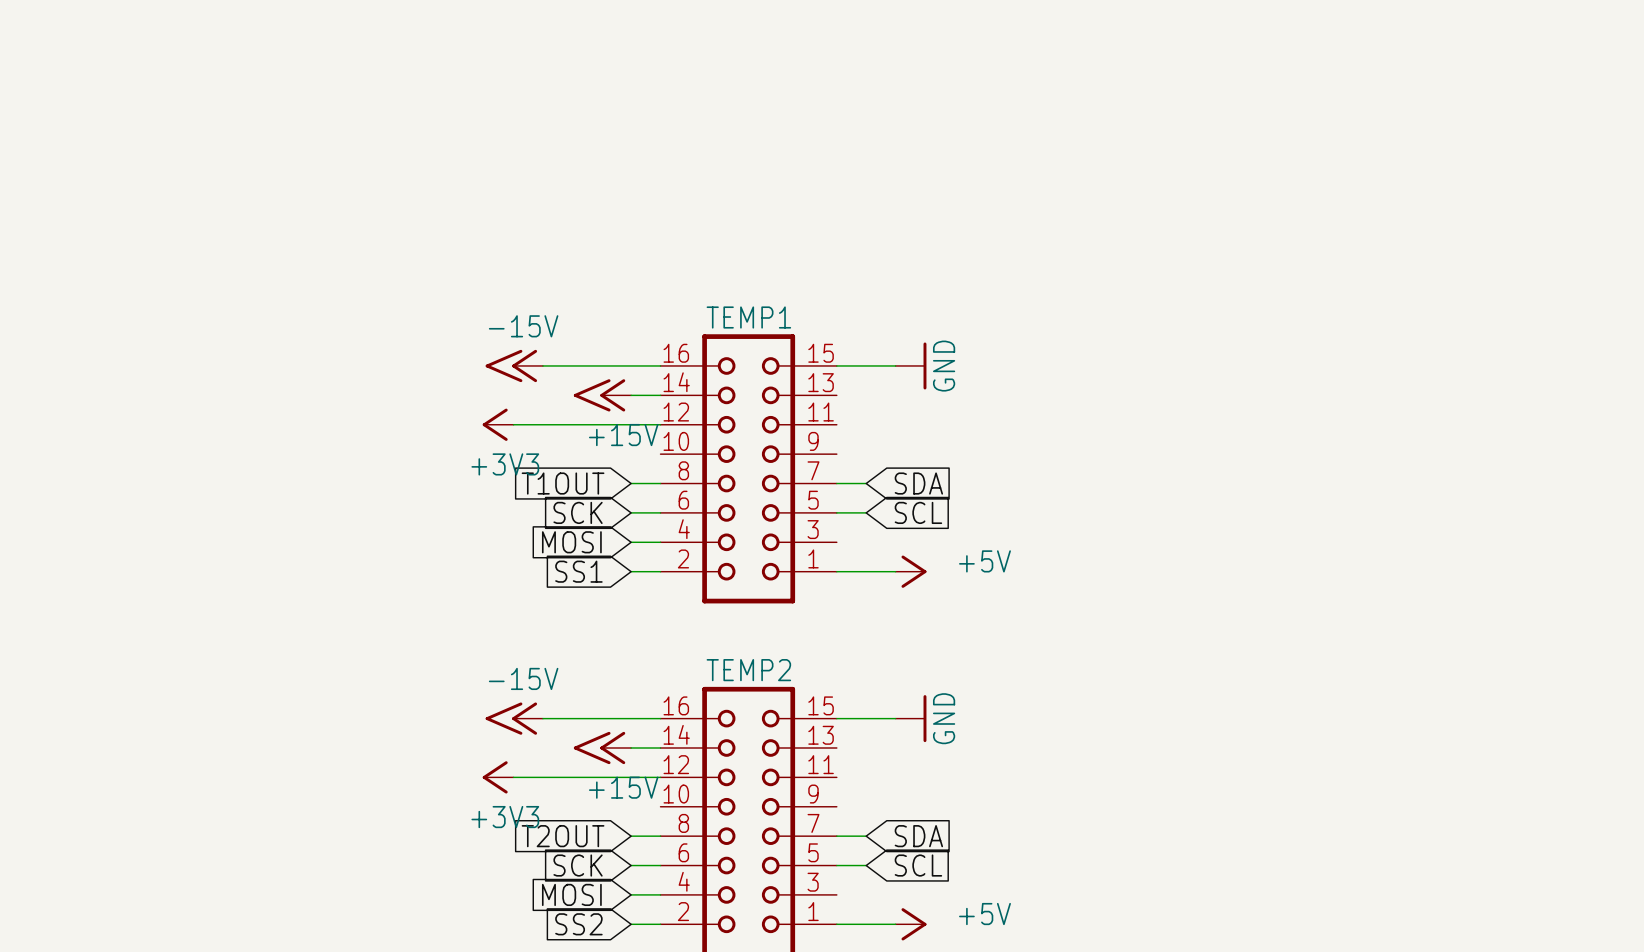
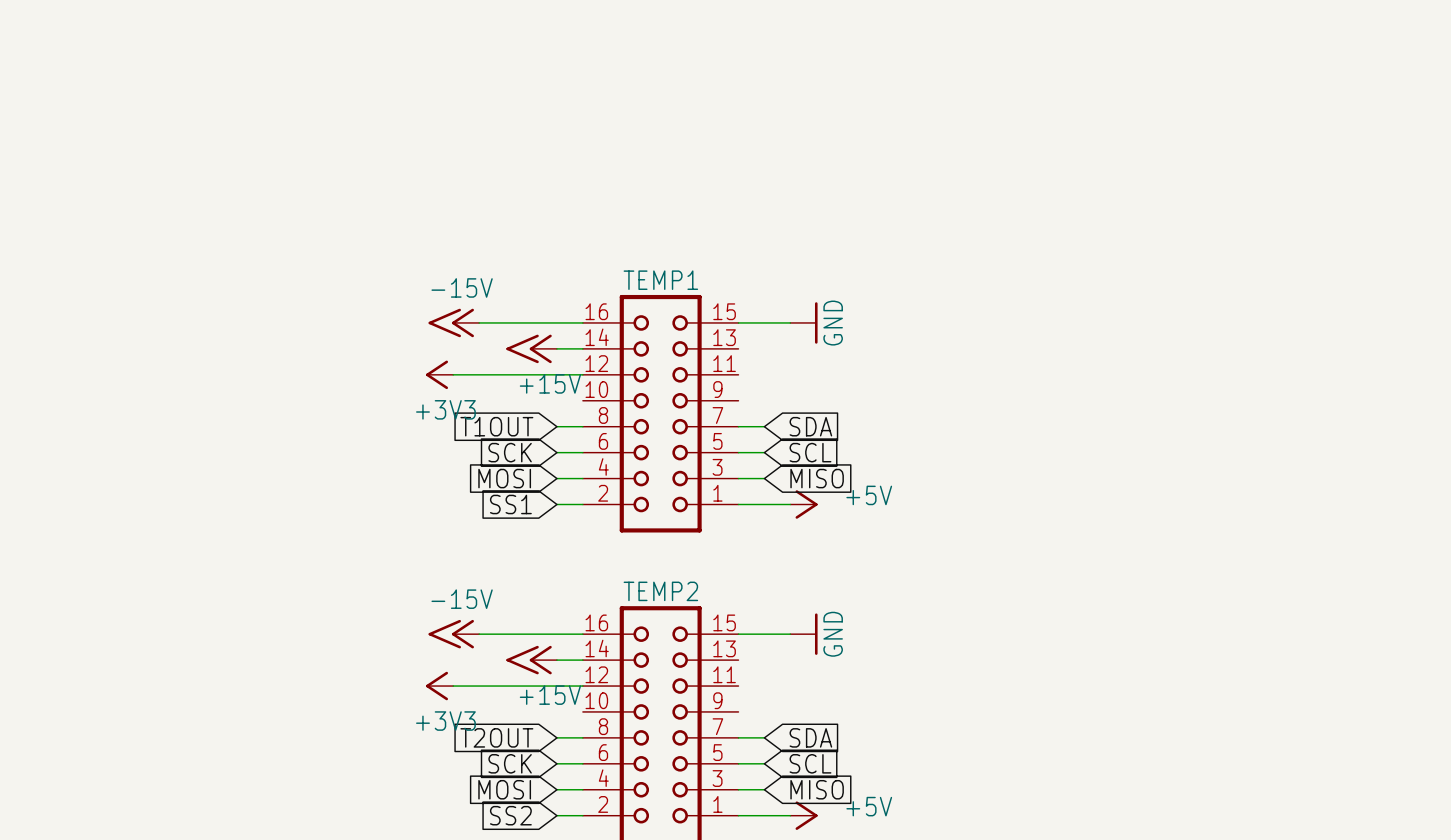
wire: none -> (738, 478) (764, 478)
global label: none -> MISO (817, 478)
wire: none -> (738, 789) (764, 789)
global label: none -> MISO (817, 789)

